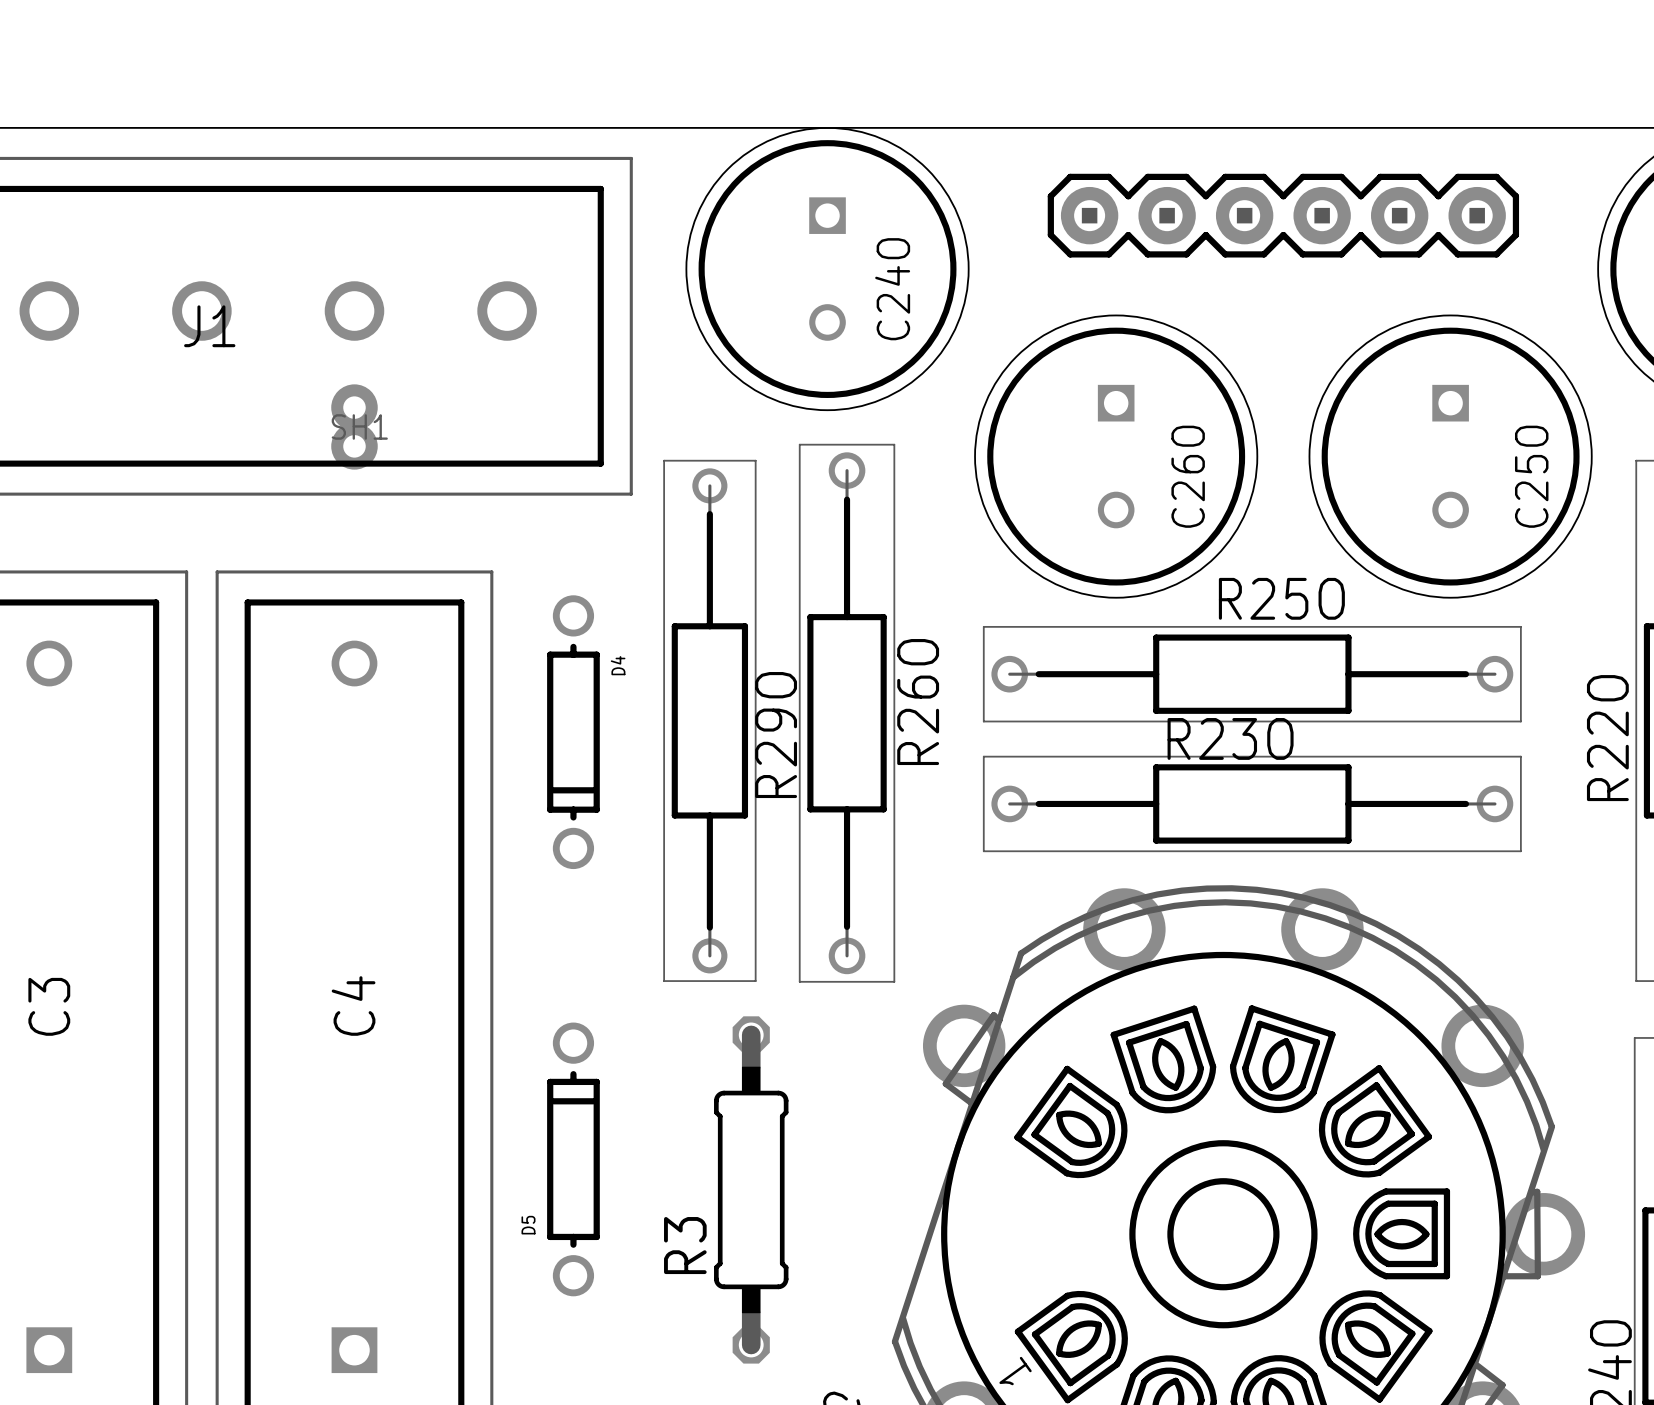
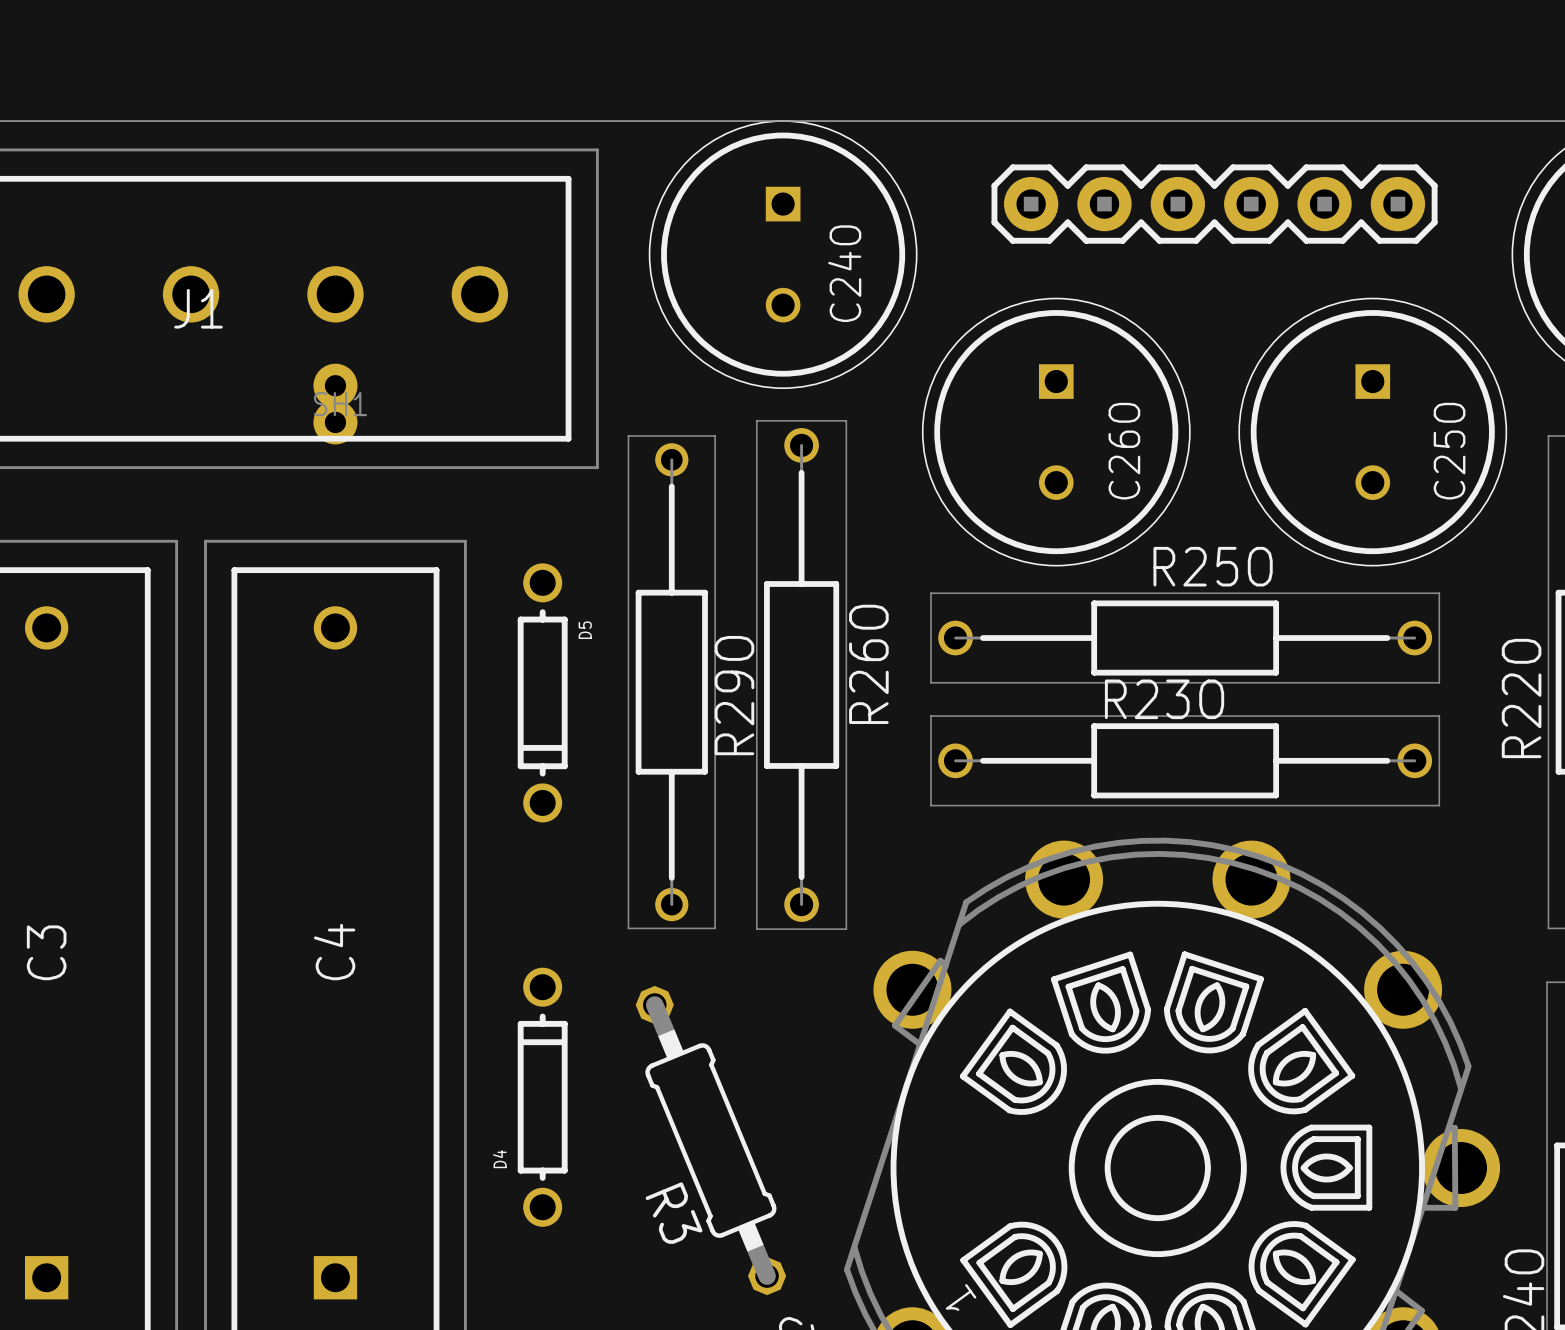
D4 name: D4 (618, 665) -> D5 (585, 630)
R3 rotation: 0° (751, 1189) -> 22.5° counterclockwise (710, 1140)
D5 name: D5 (528, 1225) -> D4 (499, 1159)

